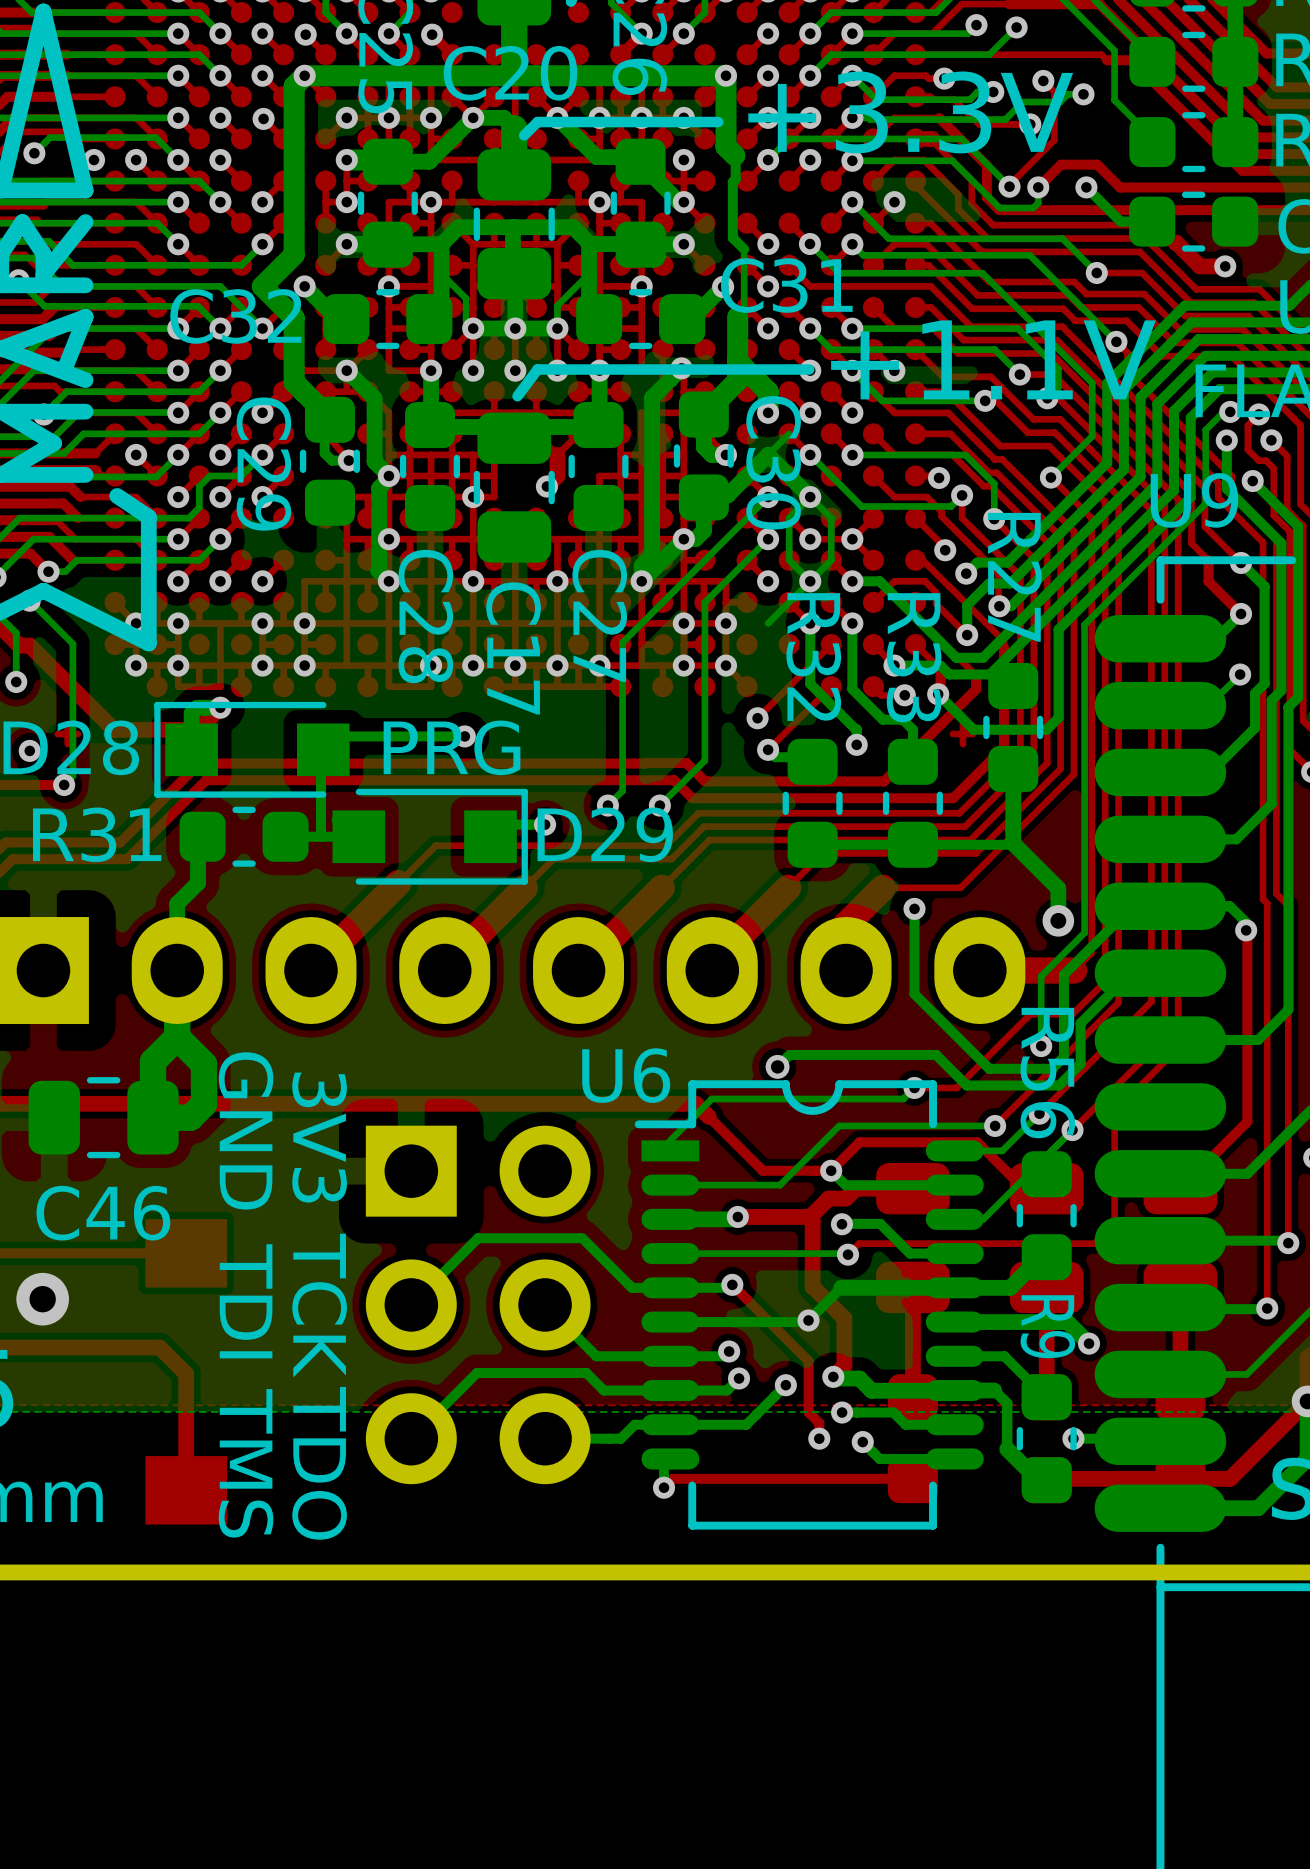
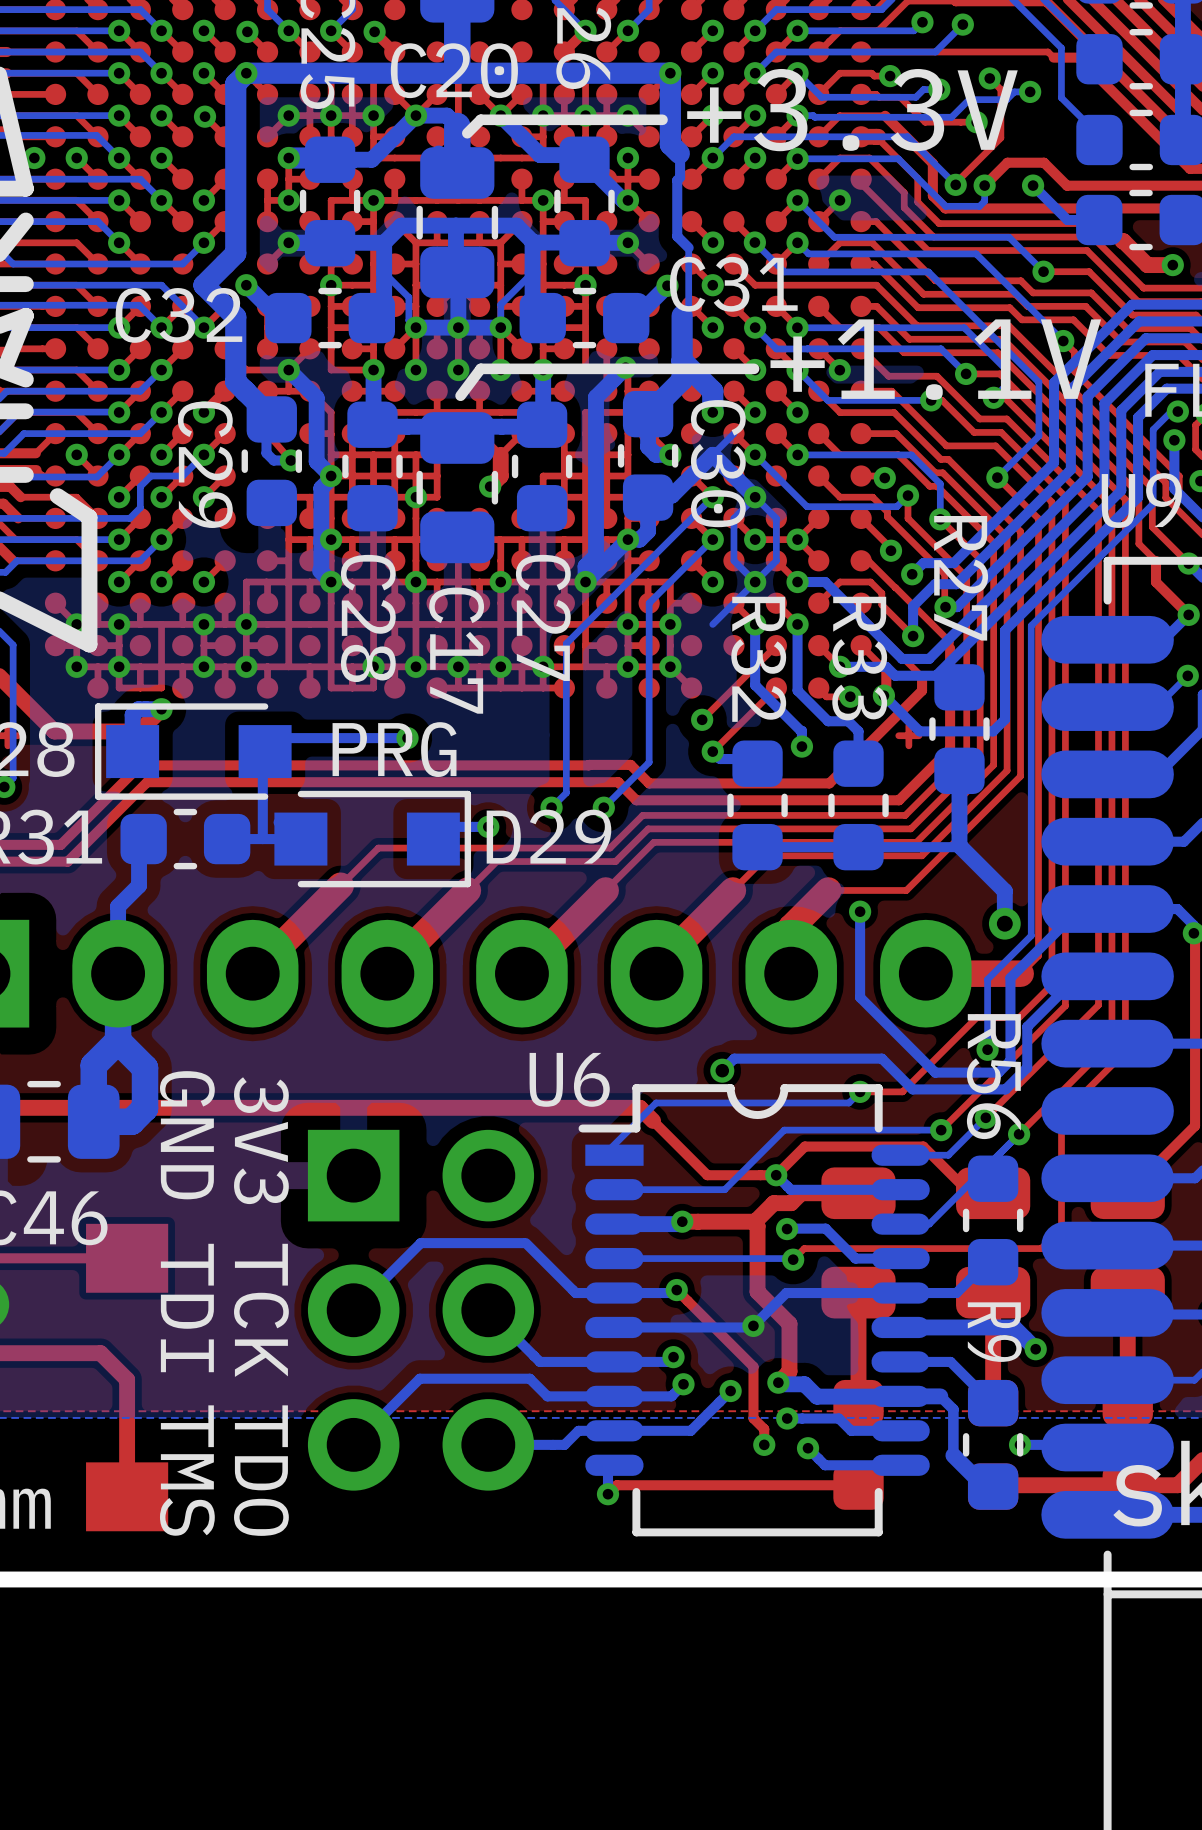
bottom track width: thick (1036, 1261) (1010, 1287) (965, 1287) -> thin (982, 1266) (956, 1293) (911, 1293)
bottom track width: thick (954, 1287) (841, 1287) -> thin (900, 1293) (786, 1293)

